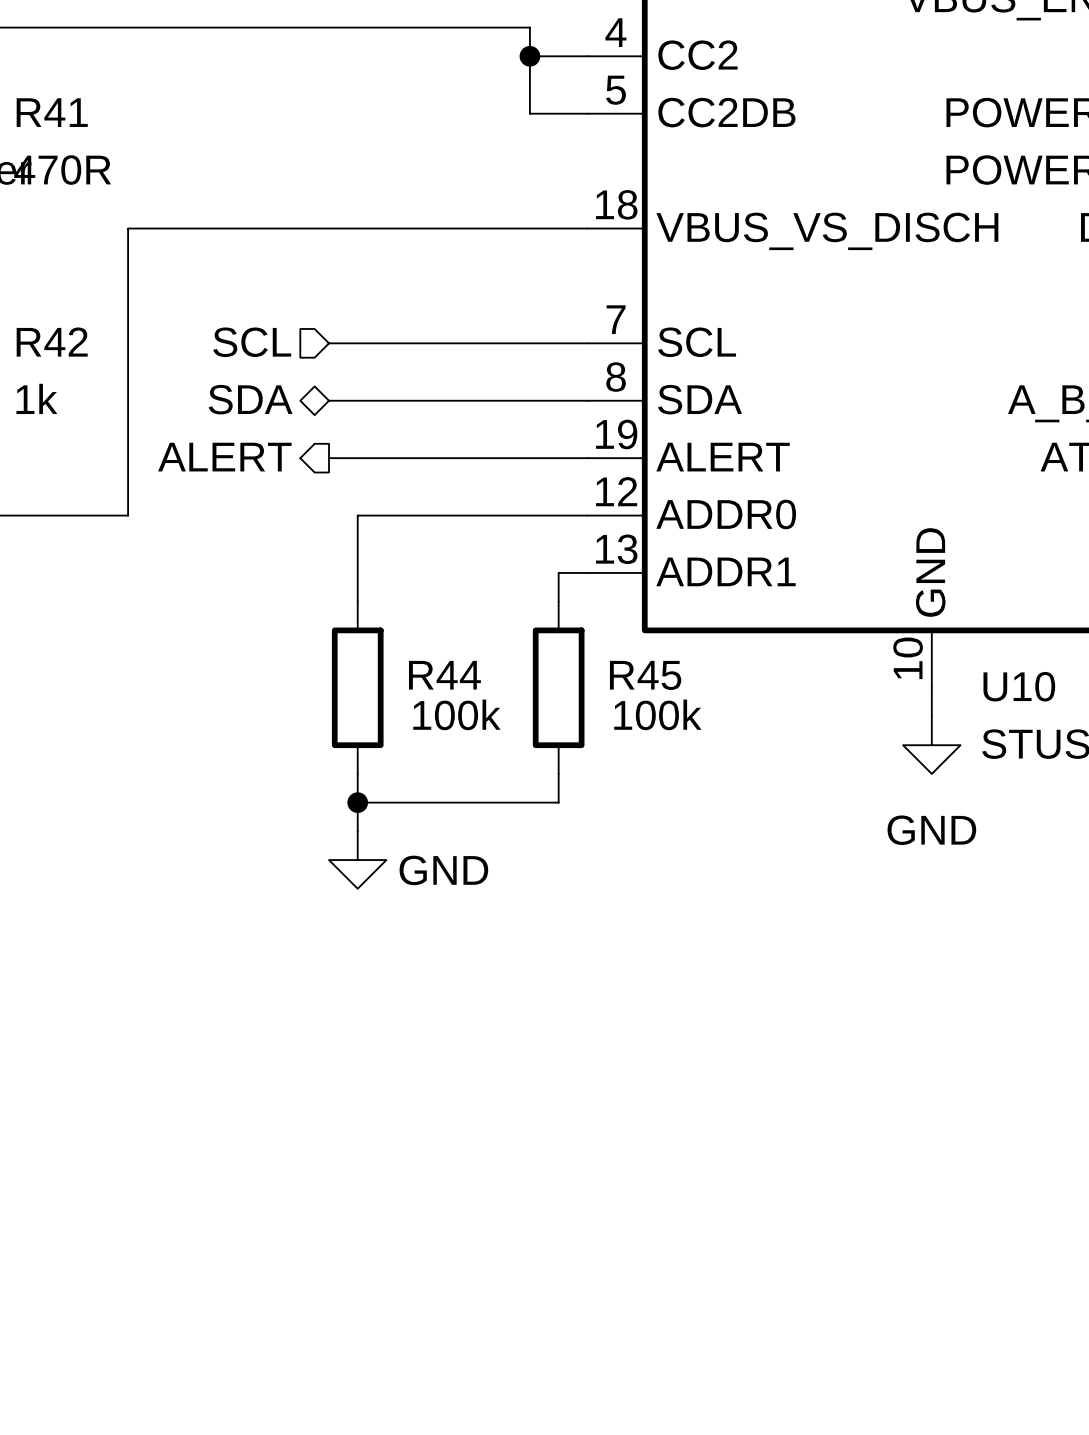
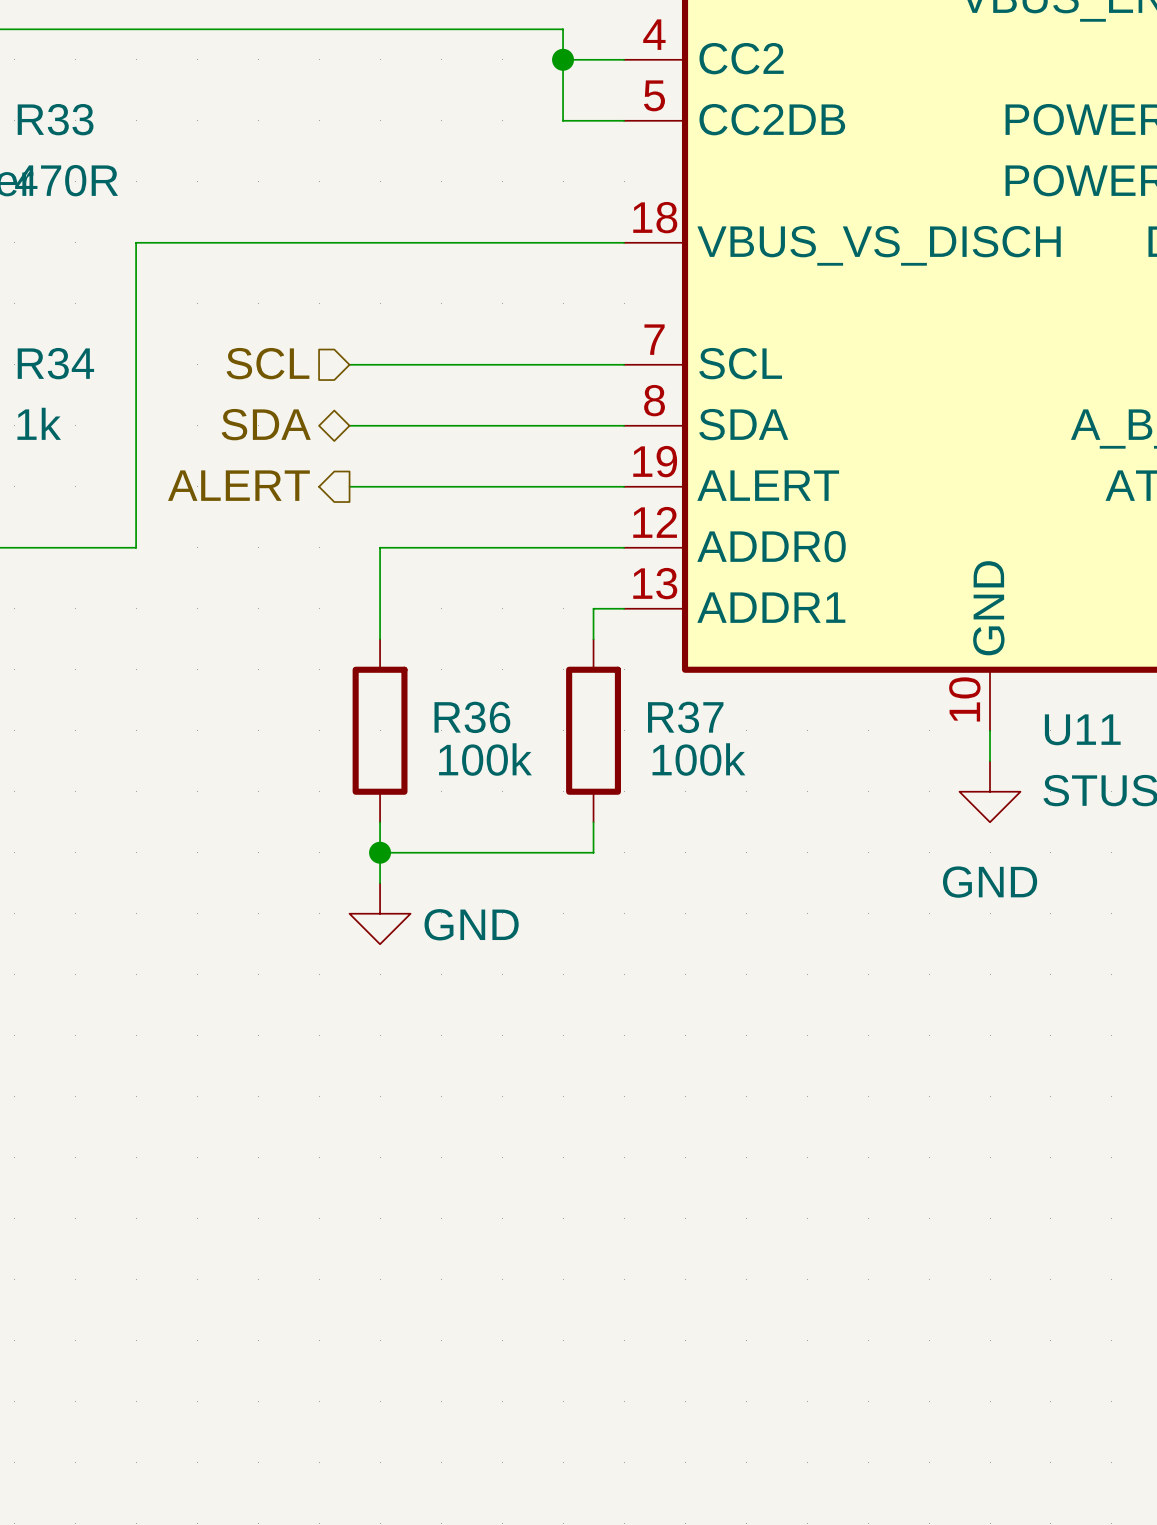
R41 name: R41 (52, 112) -> R33 (55, 119)
R42 name: R42 (52, 342) -> R34 (55, 363)
R44 name: R44 (444, 675) -> R36 (472, 717)
R45 name: R45 (645, 675) -> R37 (685, 717)
U10 name: U10 (1019, 686) -> U11 (1082, 729)

